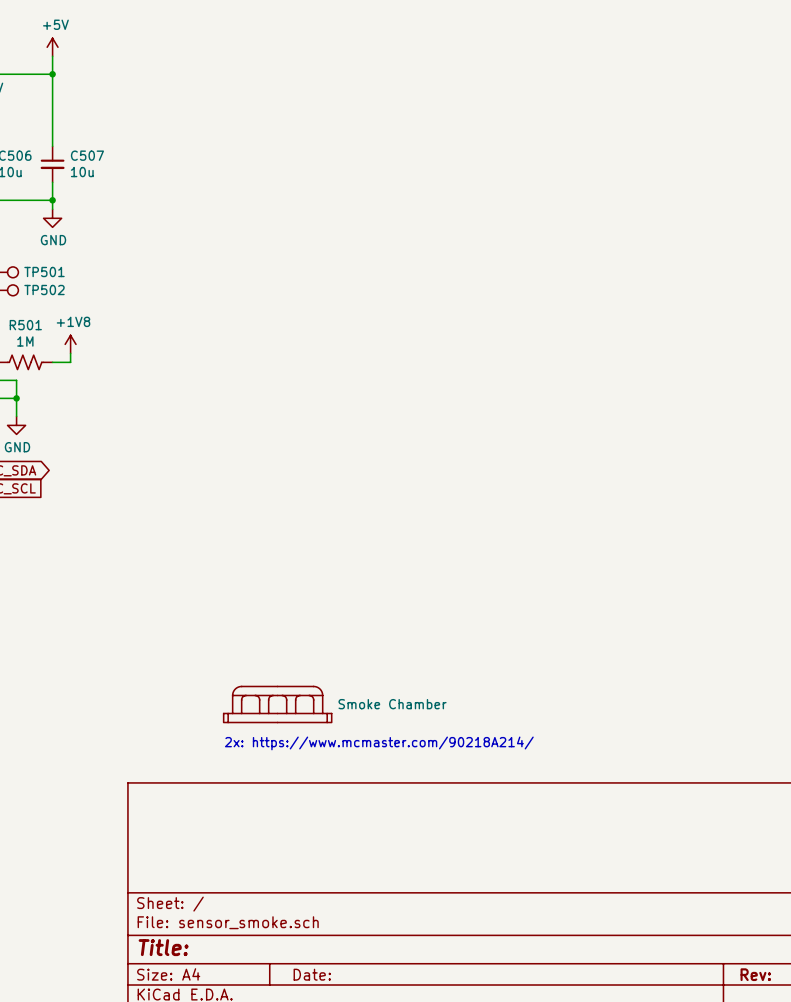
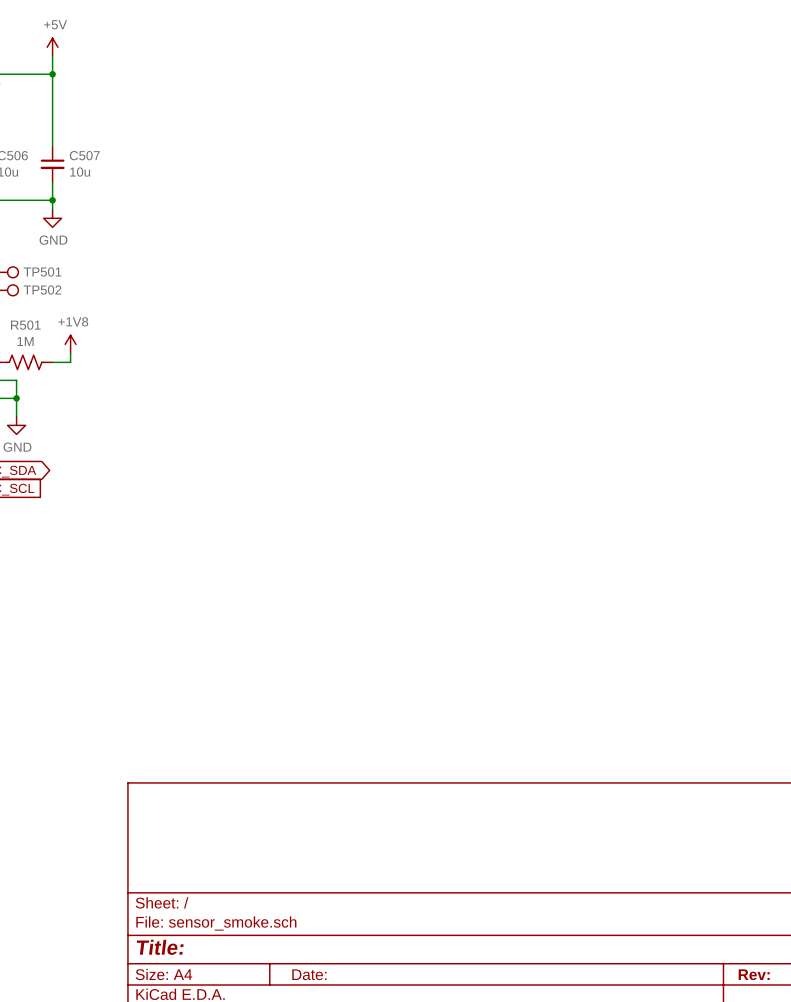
part: Smoke Chamber (277, 704) -> none
text: 2x: https://www.mcmaster.com/90218A214/ (379, 743) -> none

